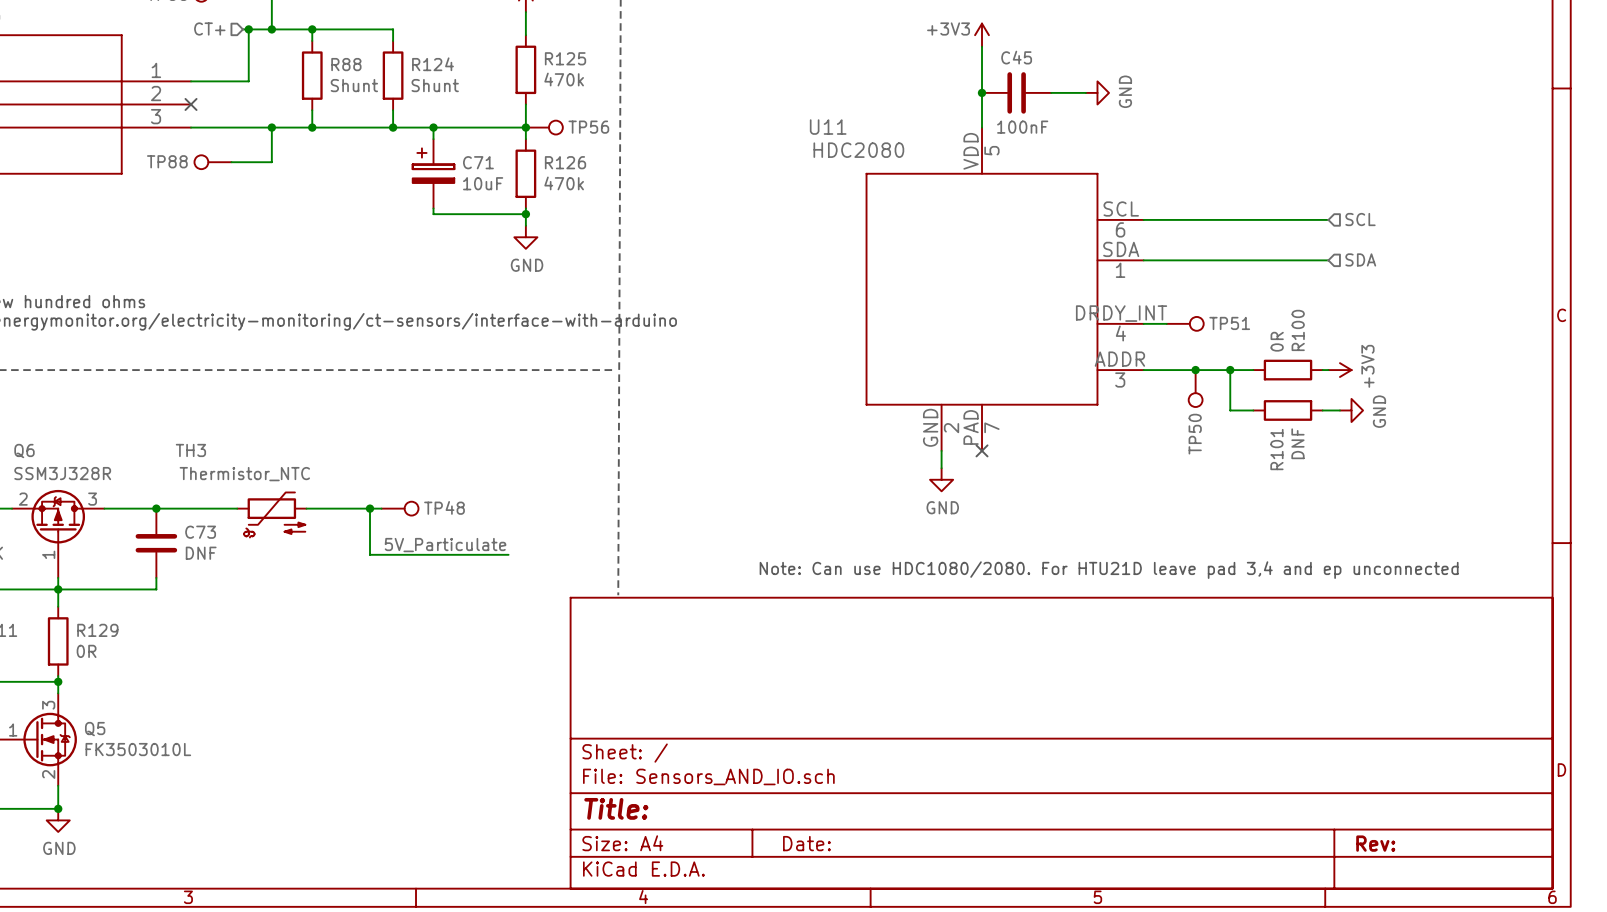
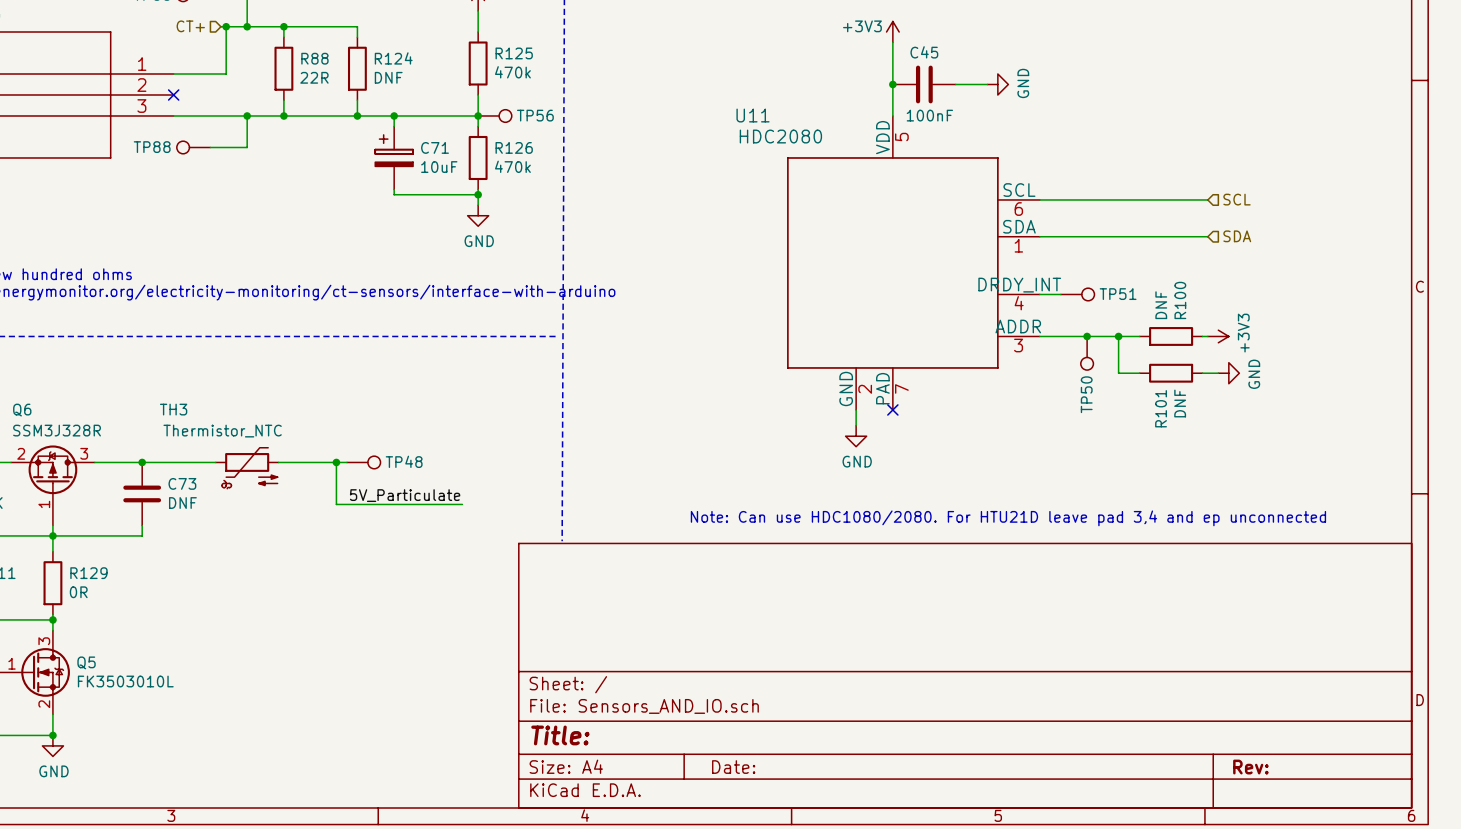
R88 value: Shunt (354, 85) -> 22R (314, 77)
R124 value: Shunt (435, 85) -> DNF (388, 77)
R100 value: 0R (1277, 341) -> DNF (1161, 305)

